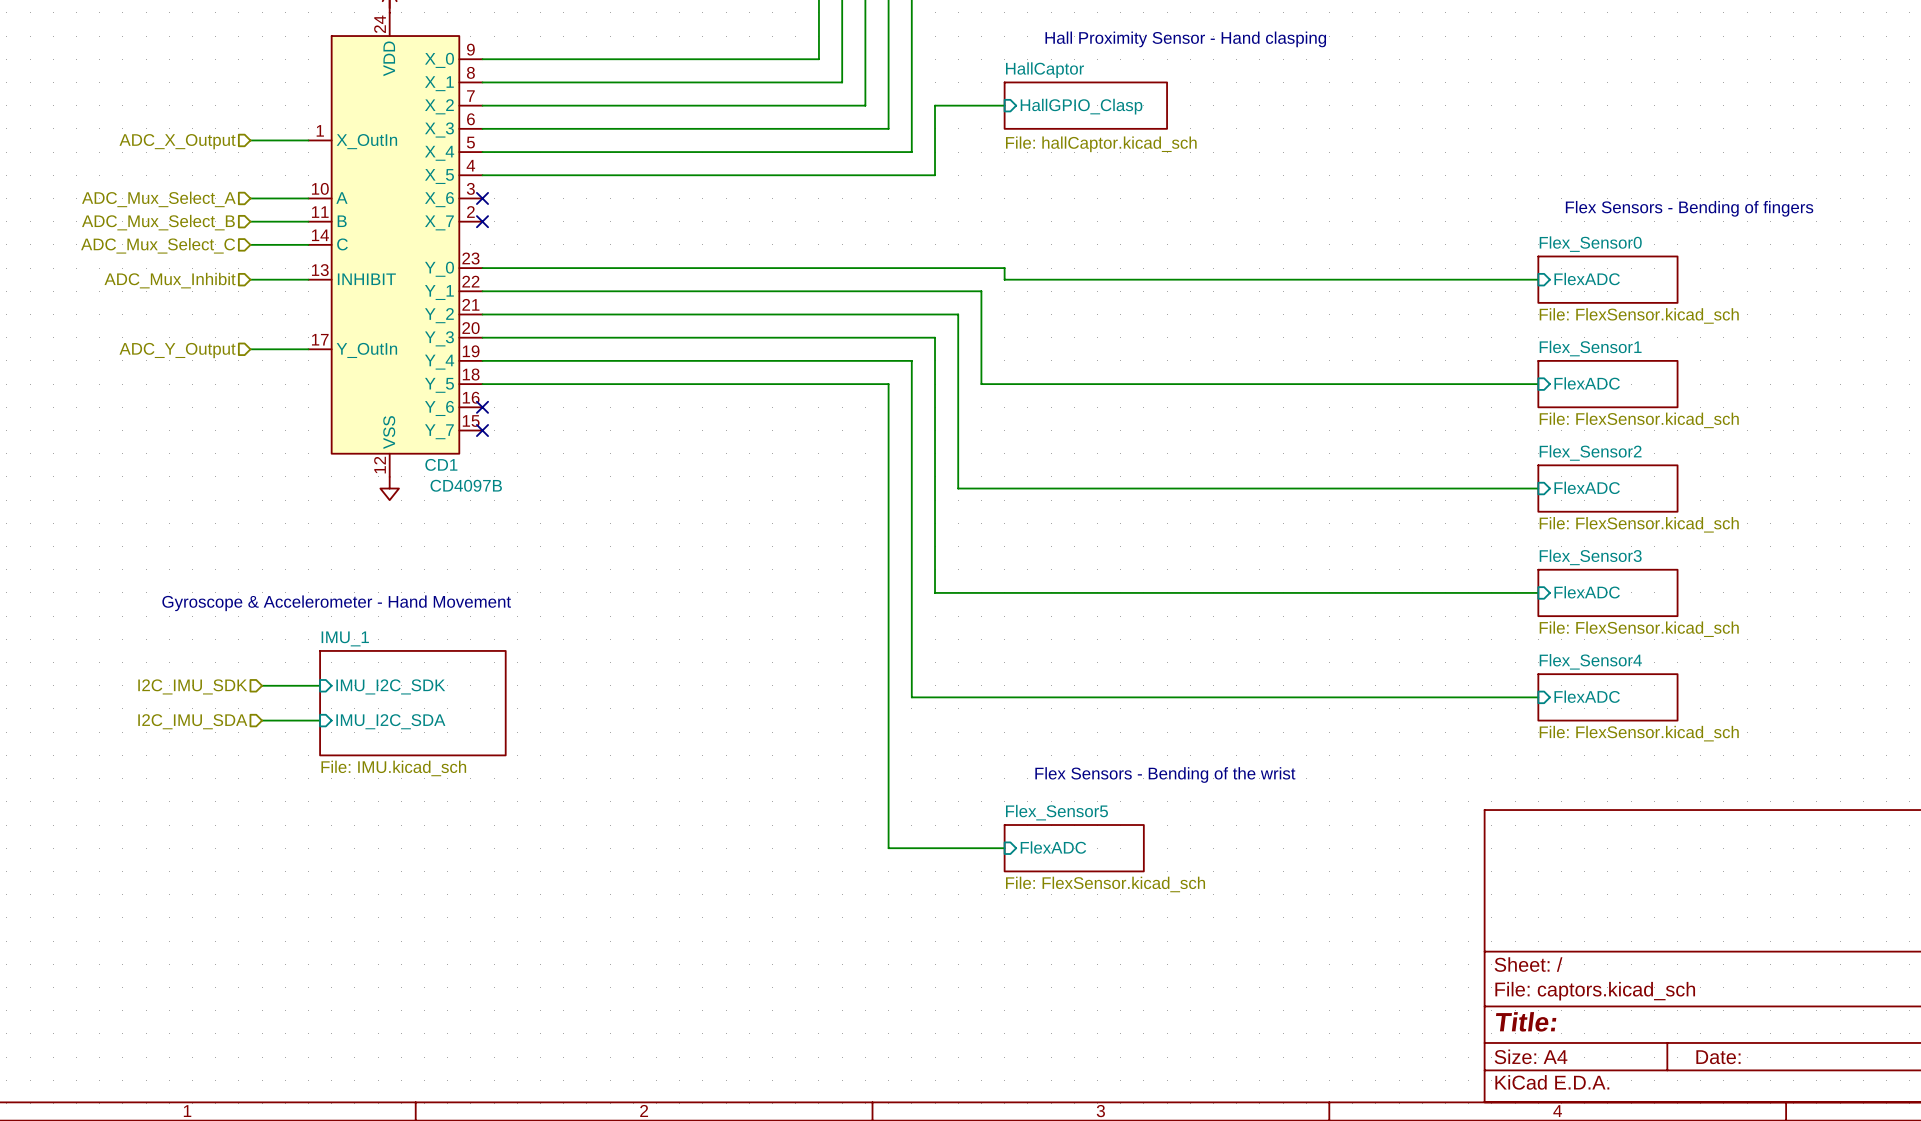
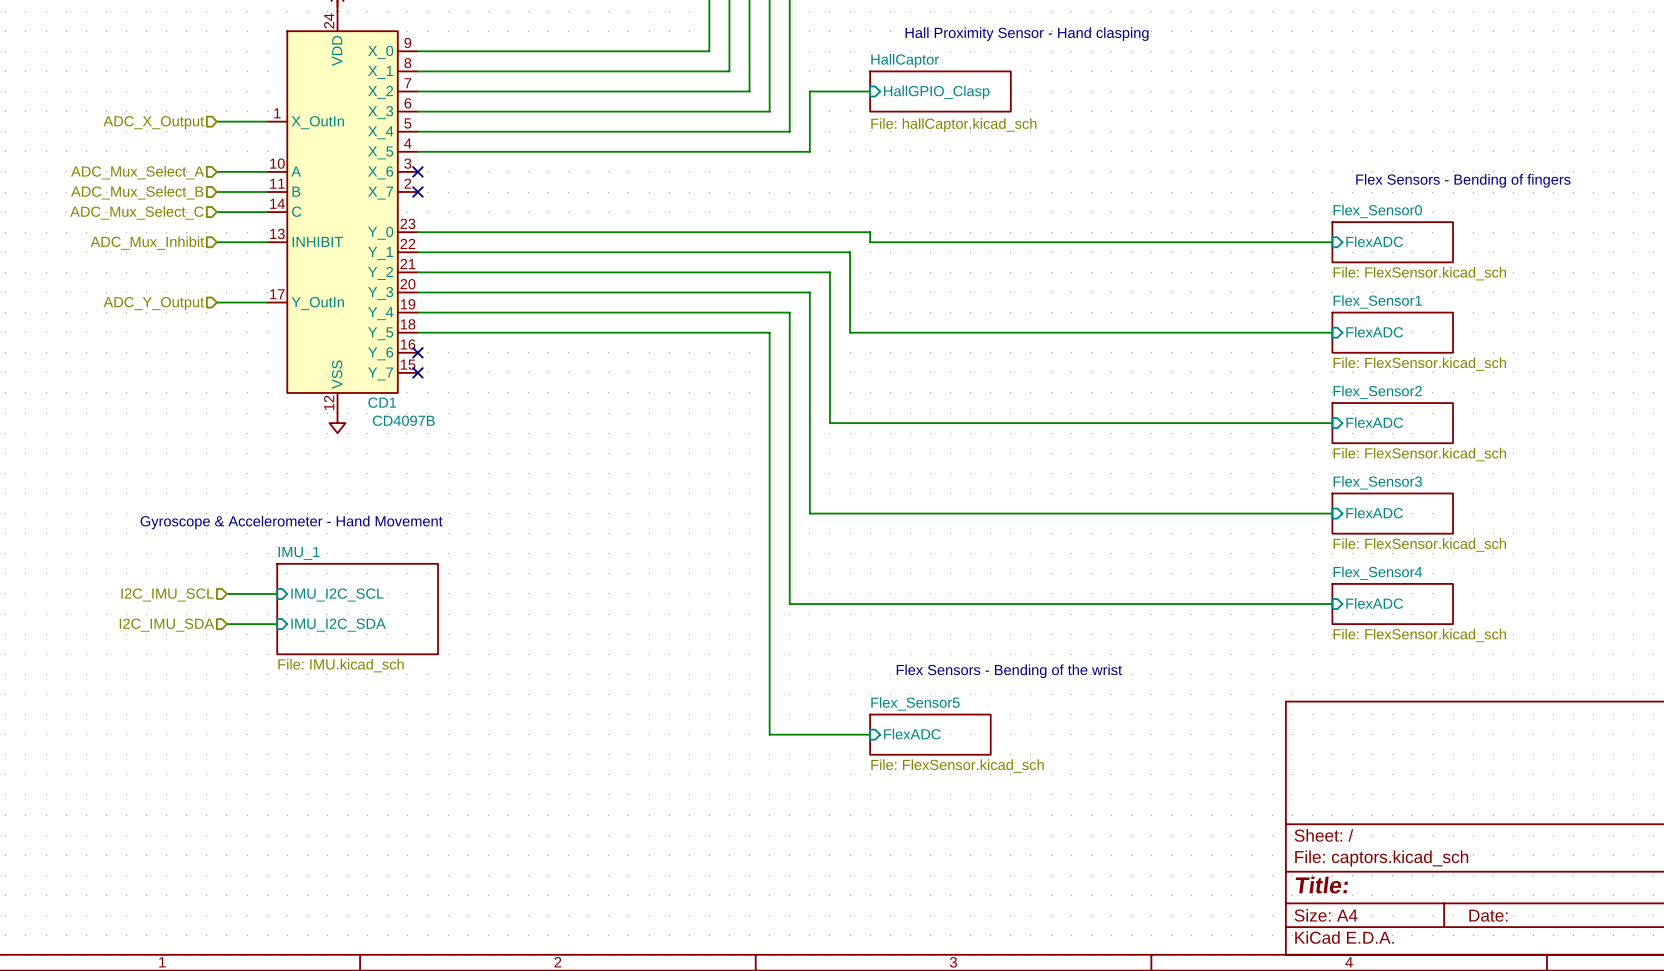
hierarchical label: I2C_IMU_SDK (192, 686) -> I2C_IMU_SCL (167, 594)
sheet pin: IMU_I2C_SDK (390, 686) -> IMU_I2C_SCL (337, 594)

